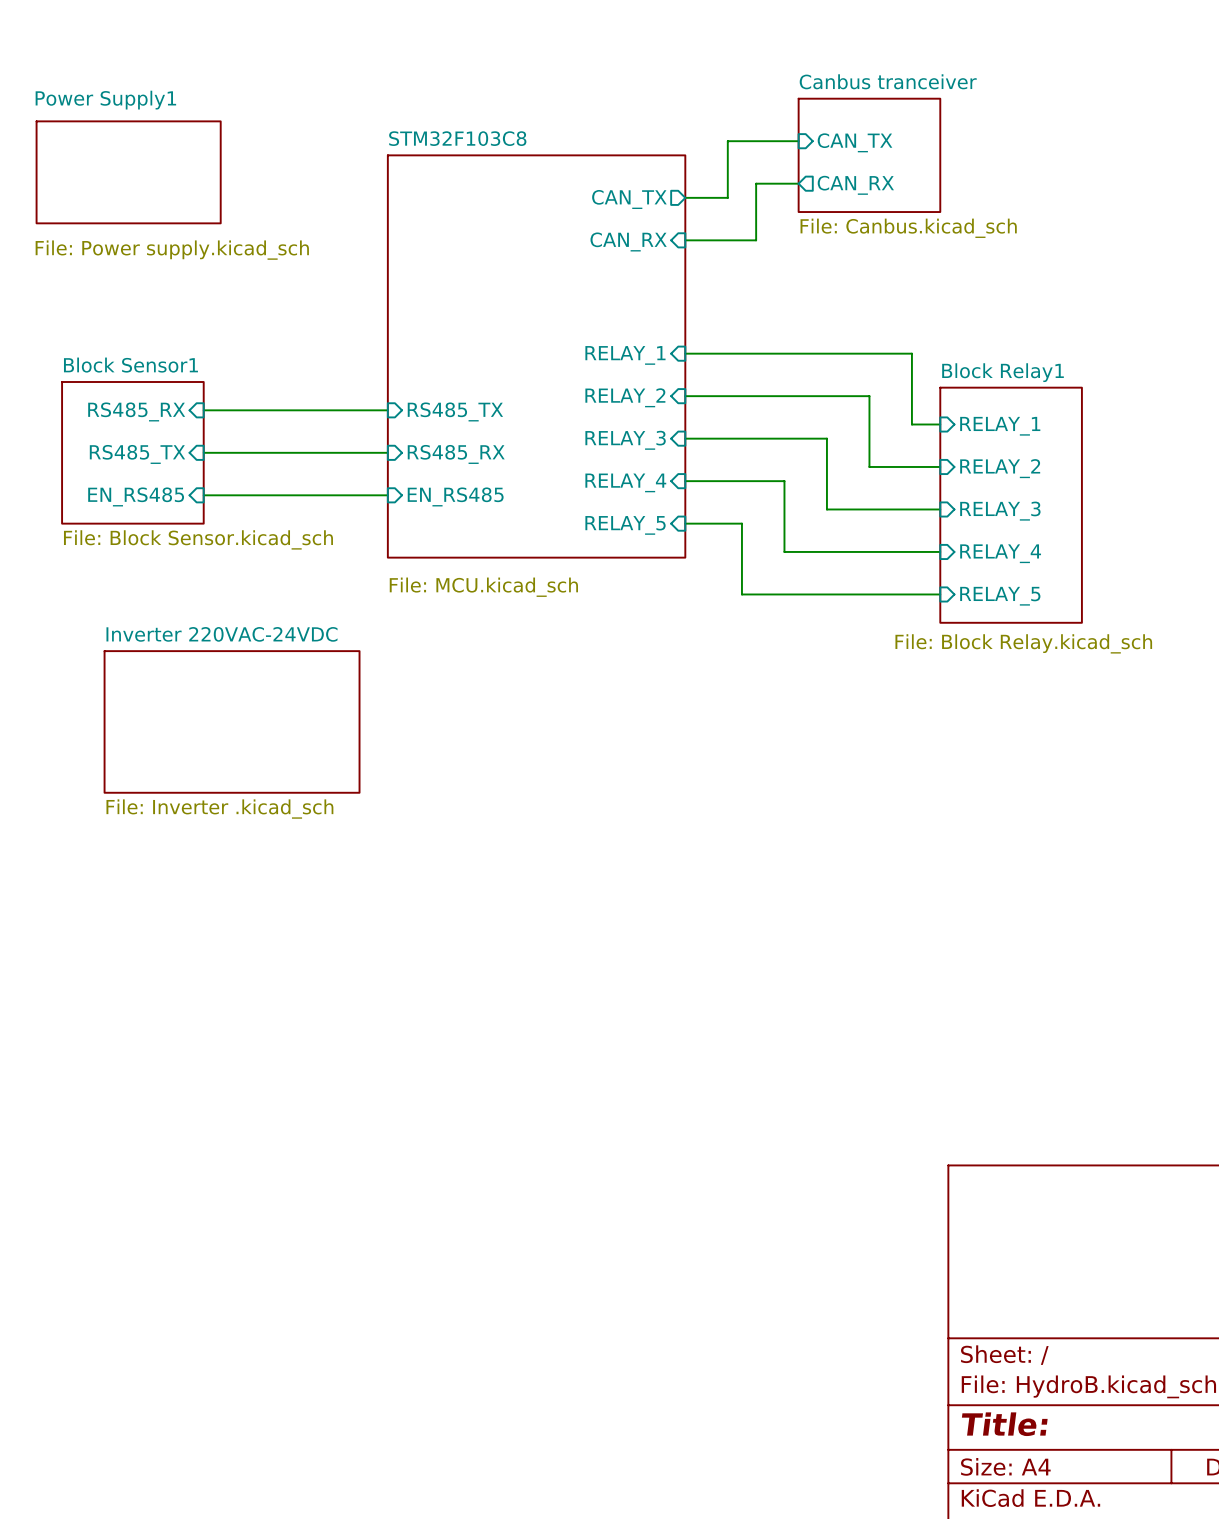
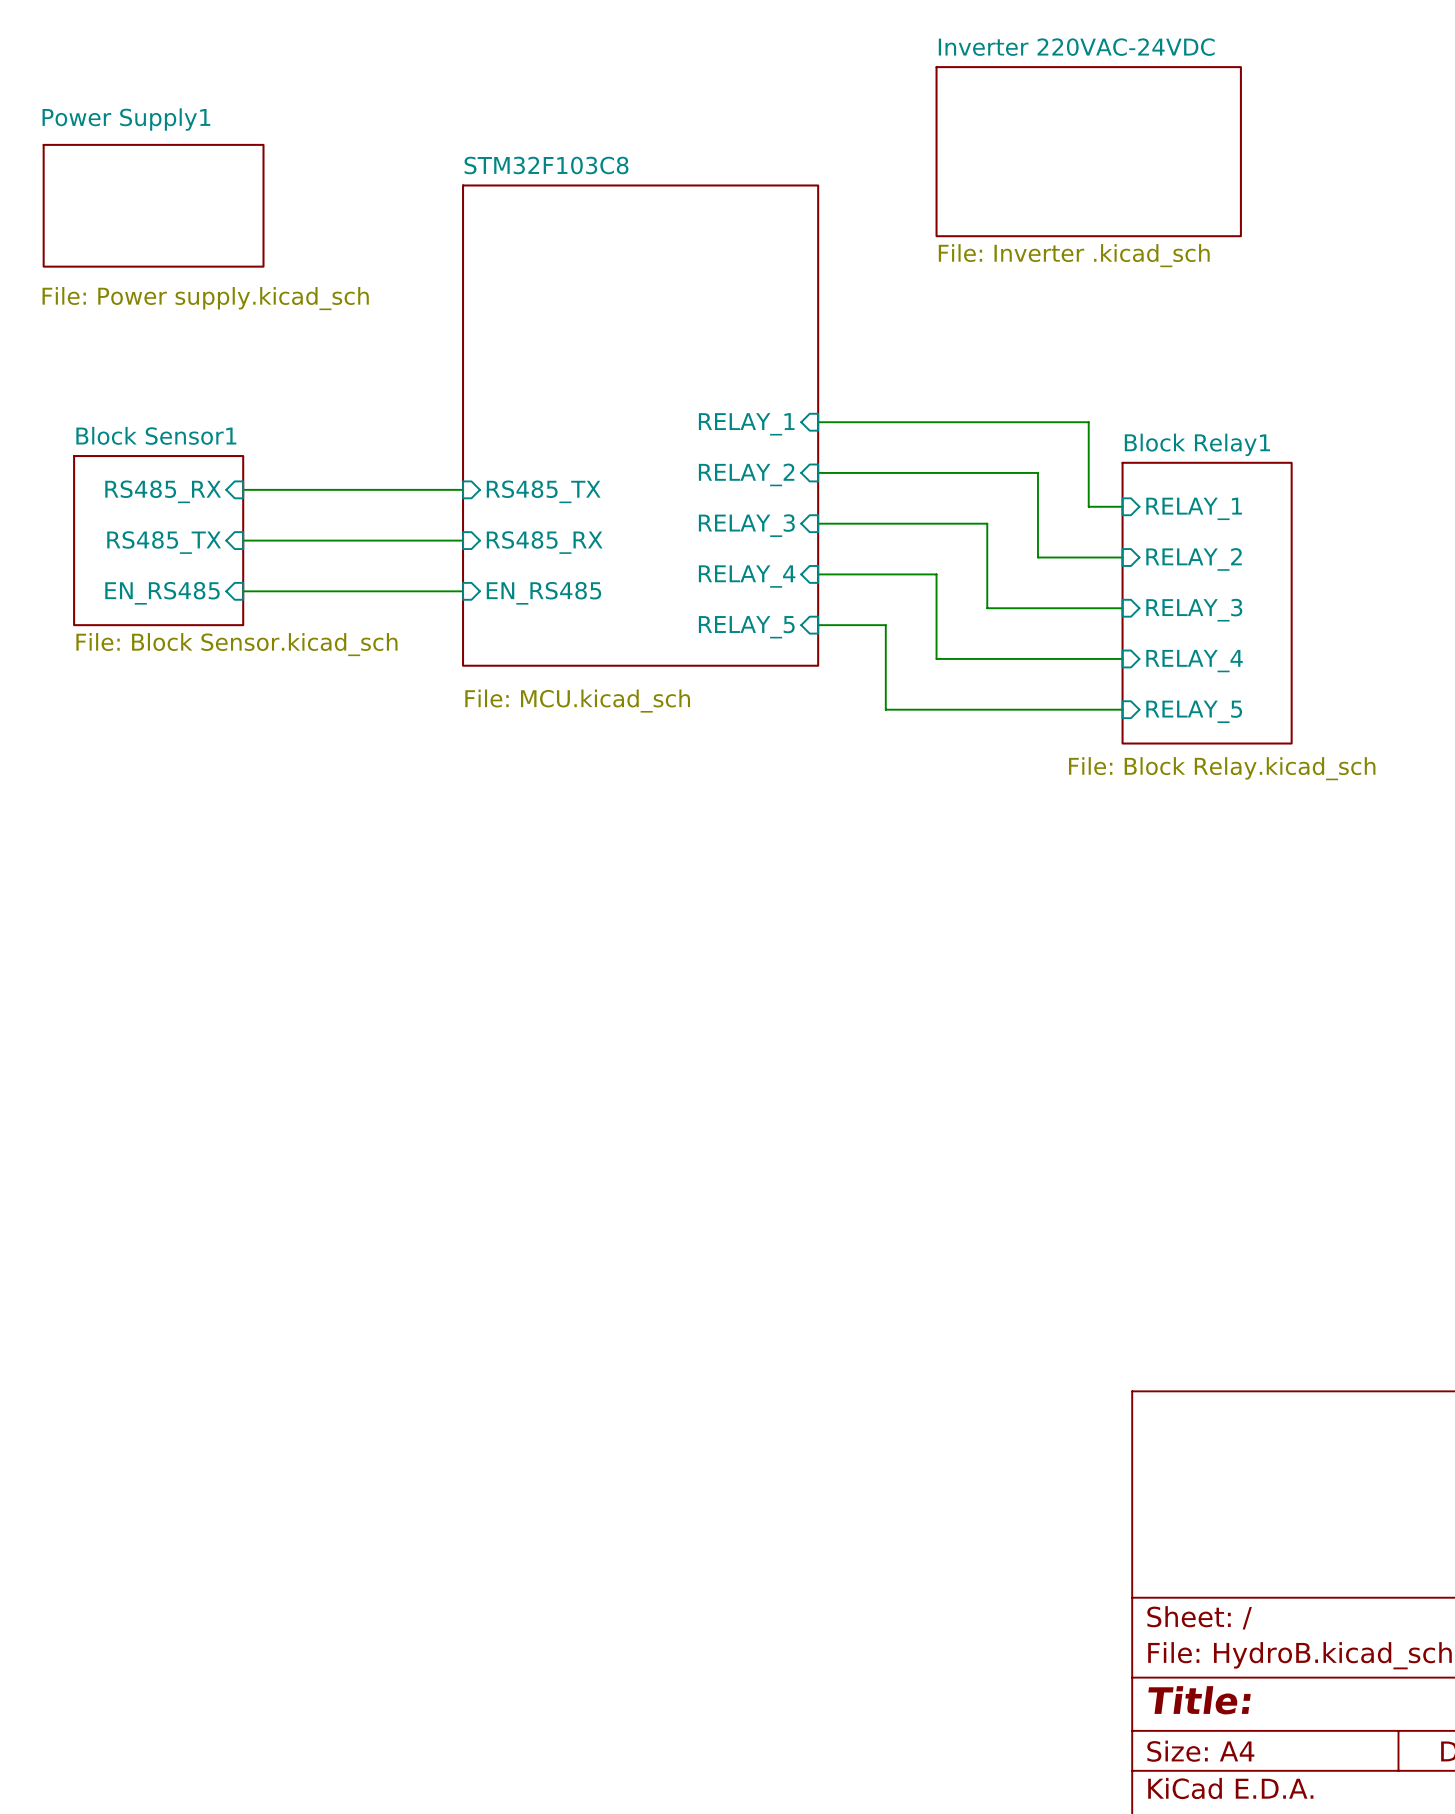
wire: (798, 141) (727, 141) (727, 197) (685, 197) -> none
sheet pin: CAN_TX (855, 142) -> none
sheet Canbus tranceiver: File: Canbus.kicad_sch (869, 155) -> none
wire: (798, 183) (756, 183) (756, 240) (685, 240) -> none
sheet pin: CAN_RX (855, 185) -> none
sheet pin: CAN_TX (629, 199) -> none
sheet pin: CAN_RX (628, 241) -> none
sheet Inverter 220VAC-24VDC position: (232, 721) -> (1088, 151)

